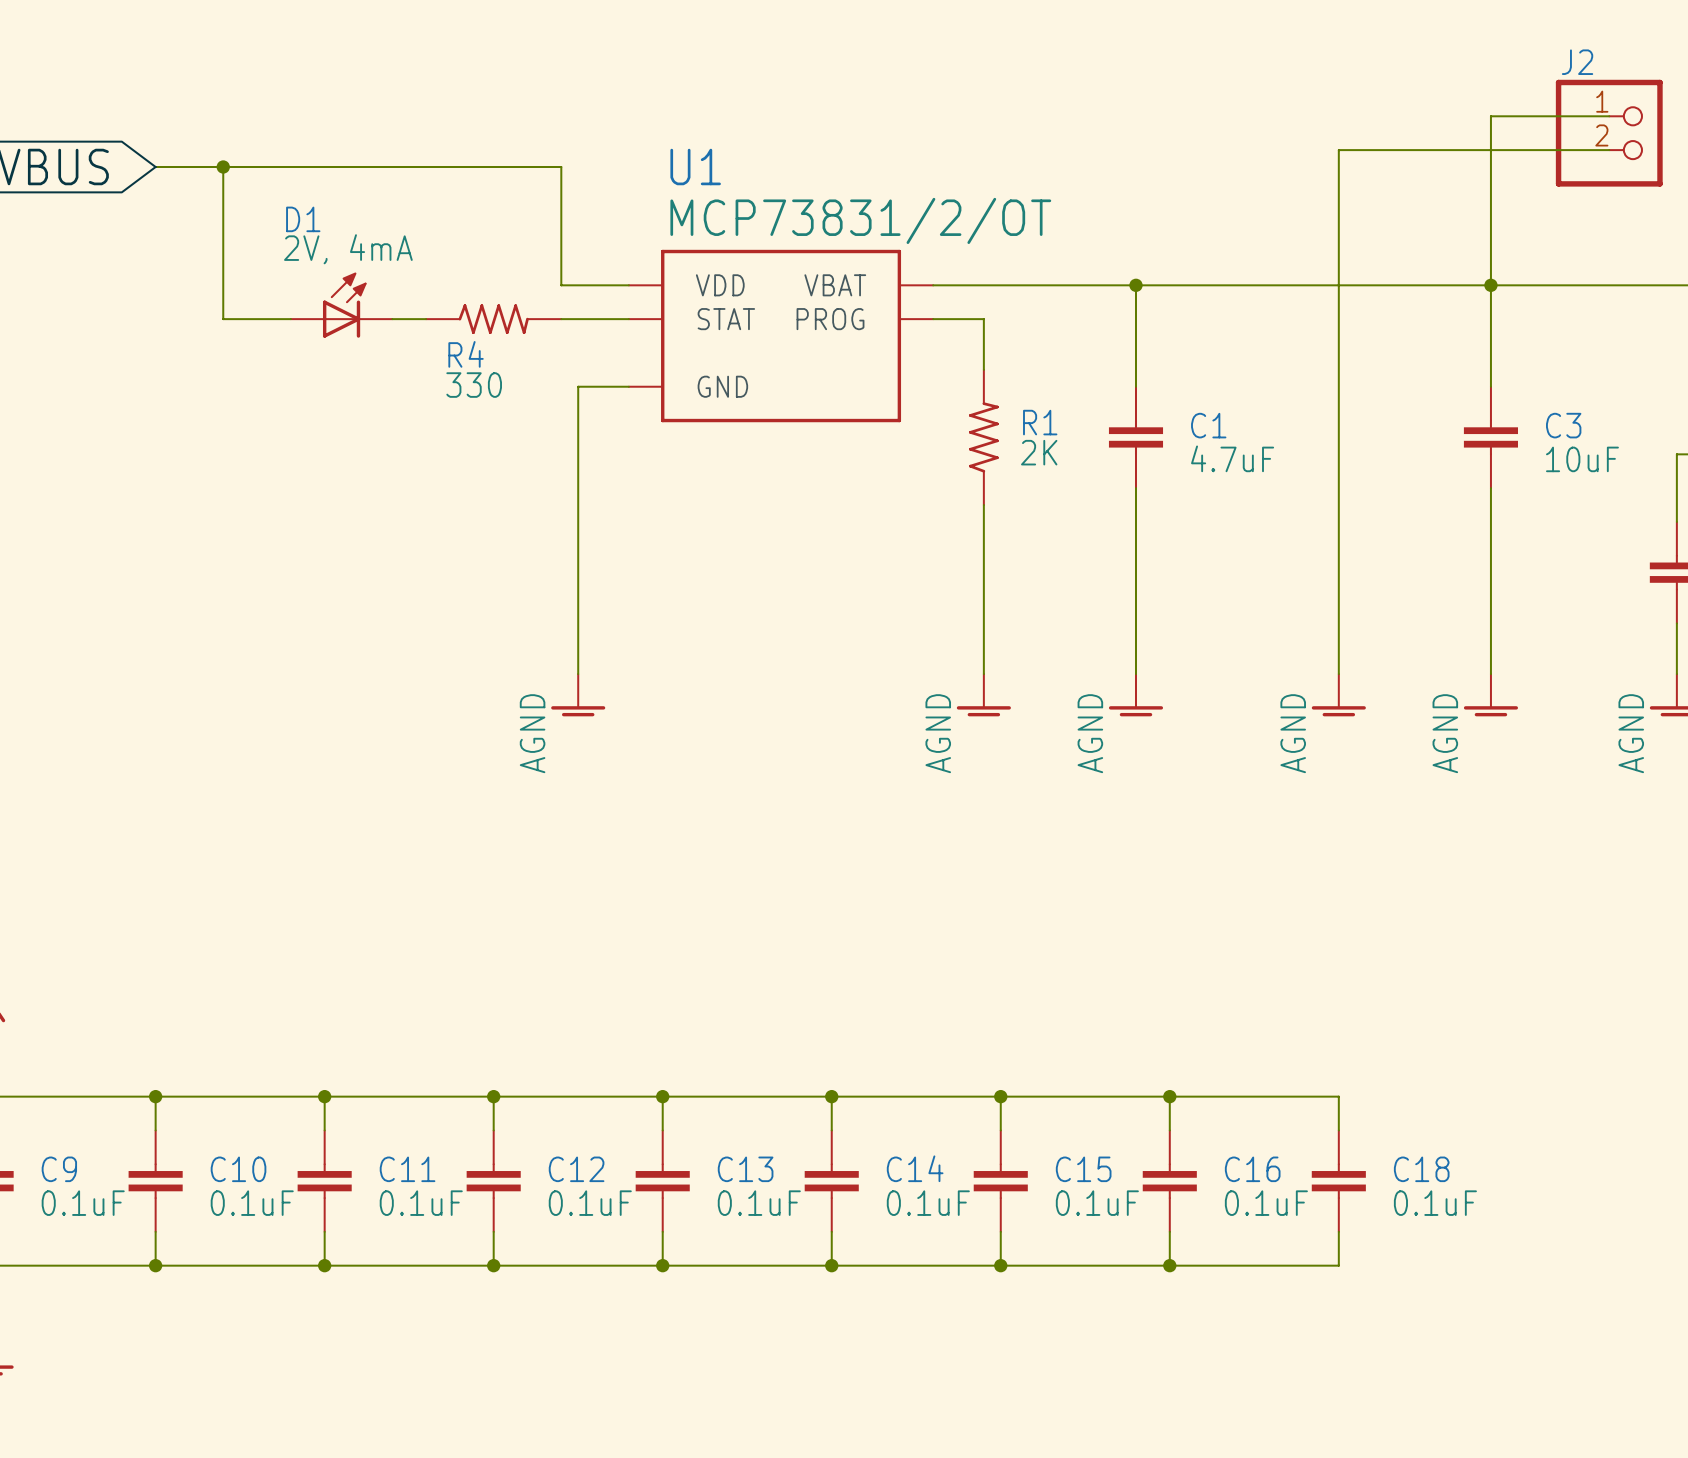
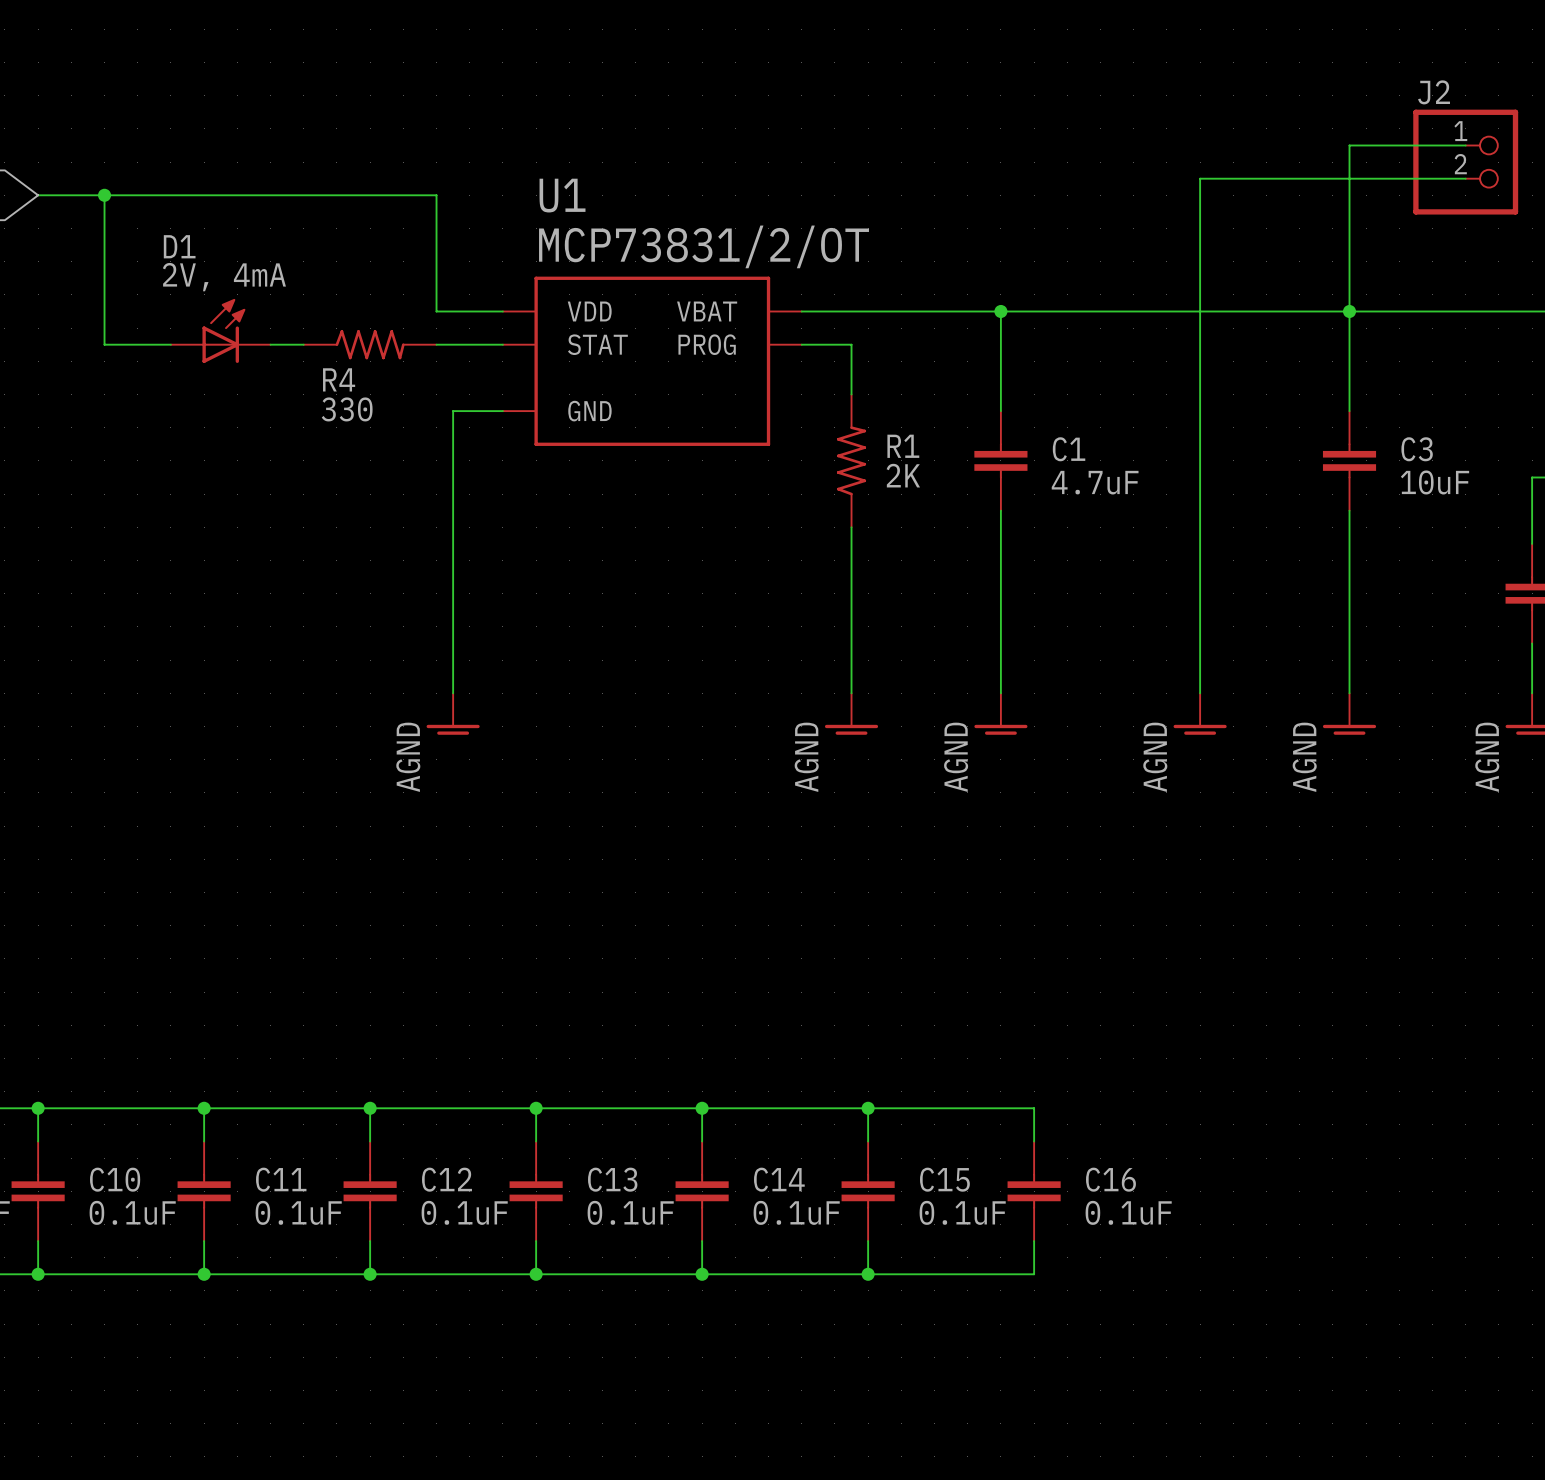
wire: (1169, 1096) (1338, 1096) (1338, 1130) -> none
junction: (1169, 1096) -> none
C18: 0.1uF (1338, 1181) -> none
wire: (1338, 1231) (1338, 1265) (1169, 1265) -> none
junction: (1169, 1265) -> none

